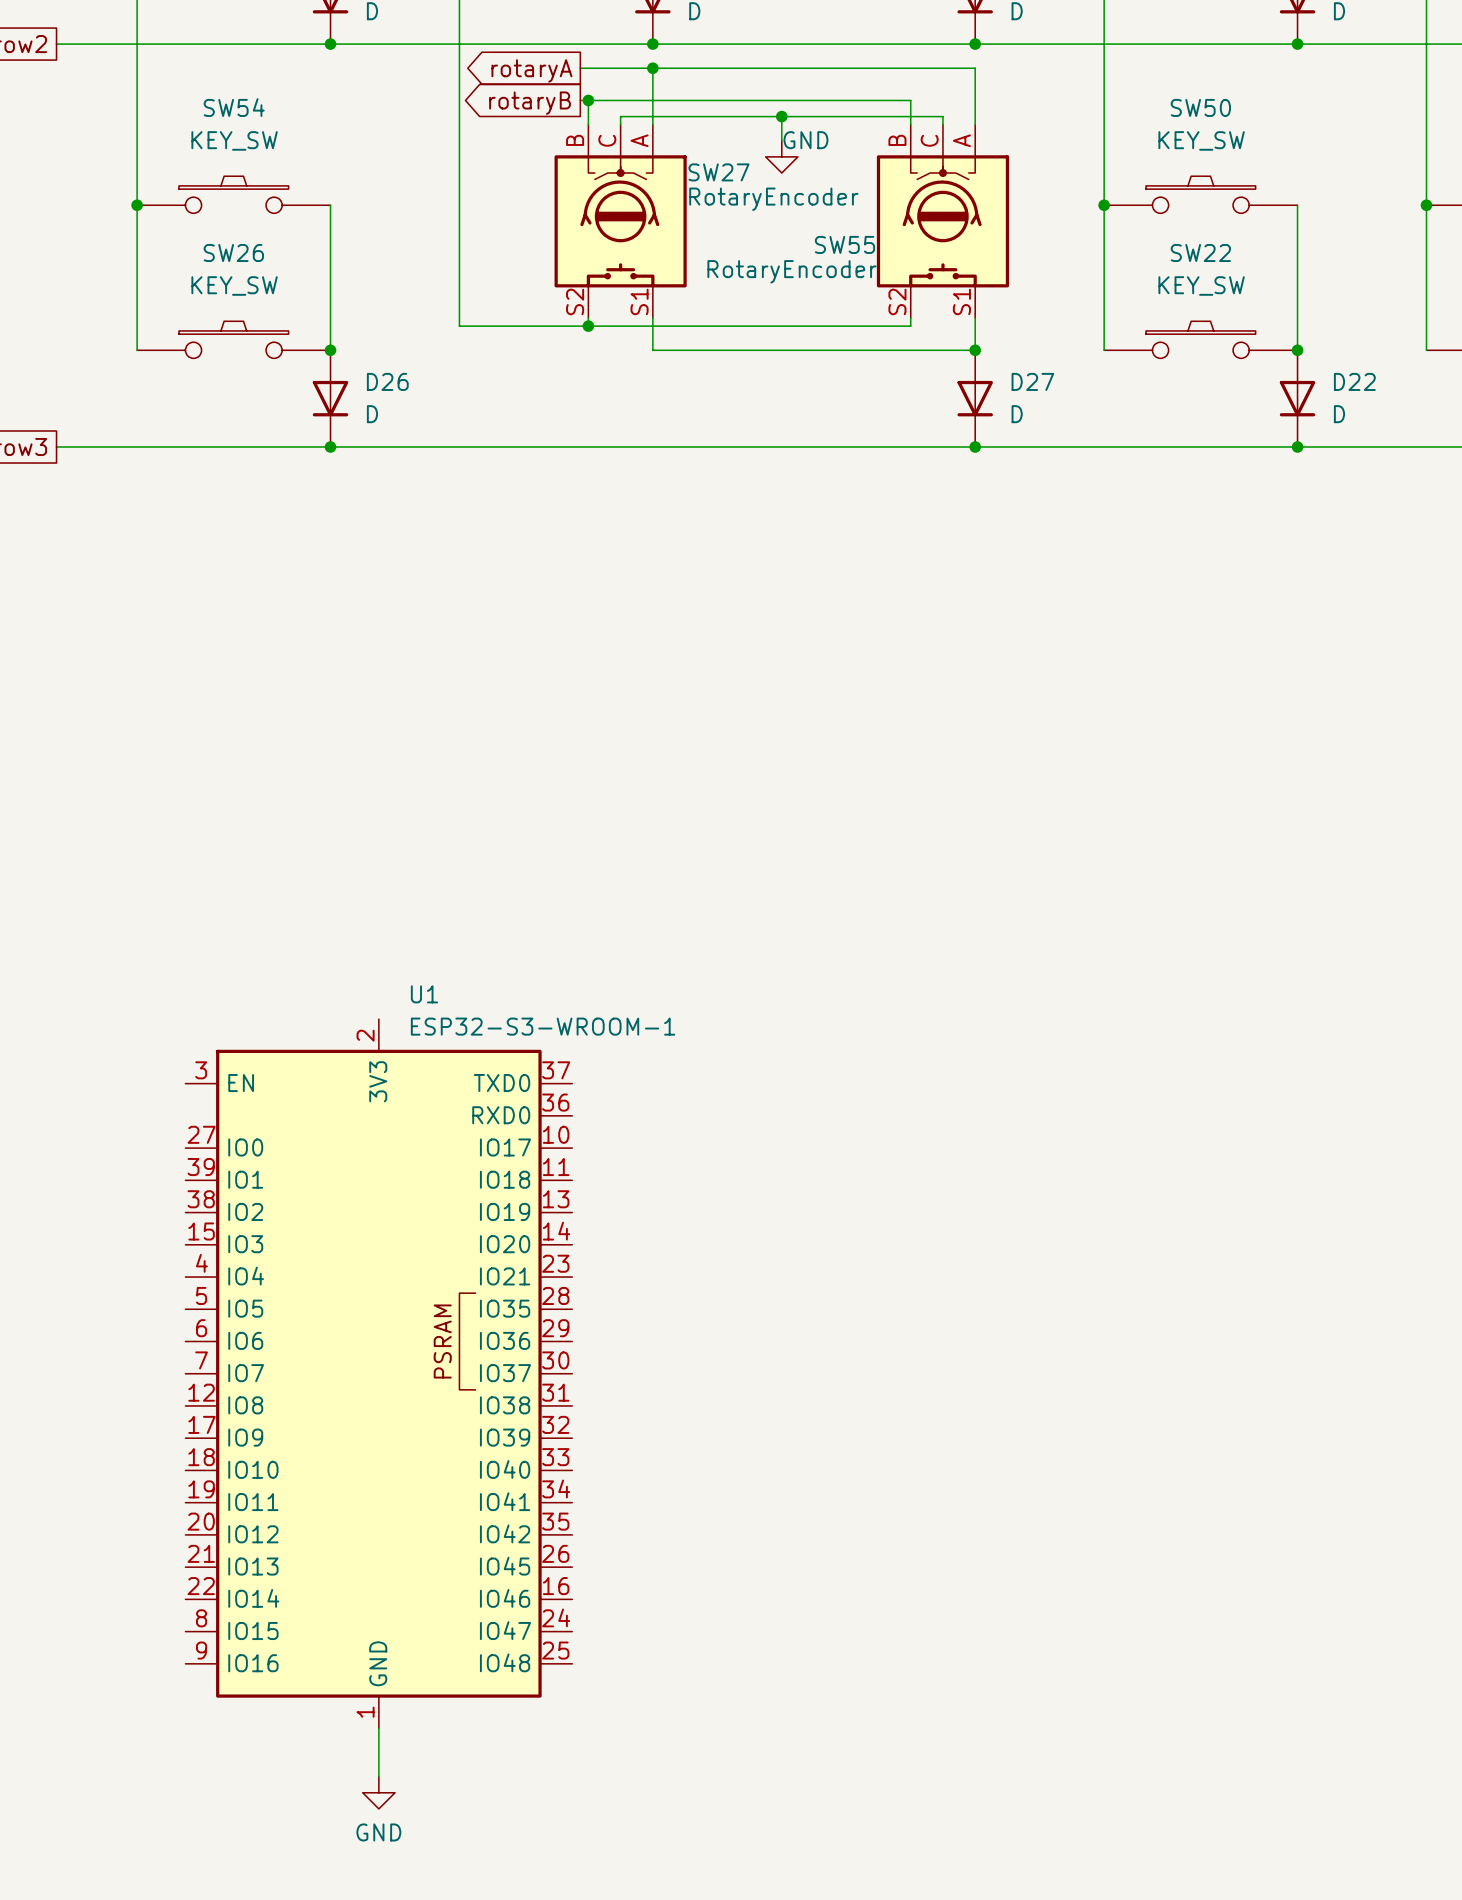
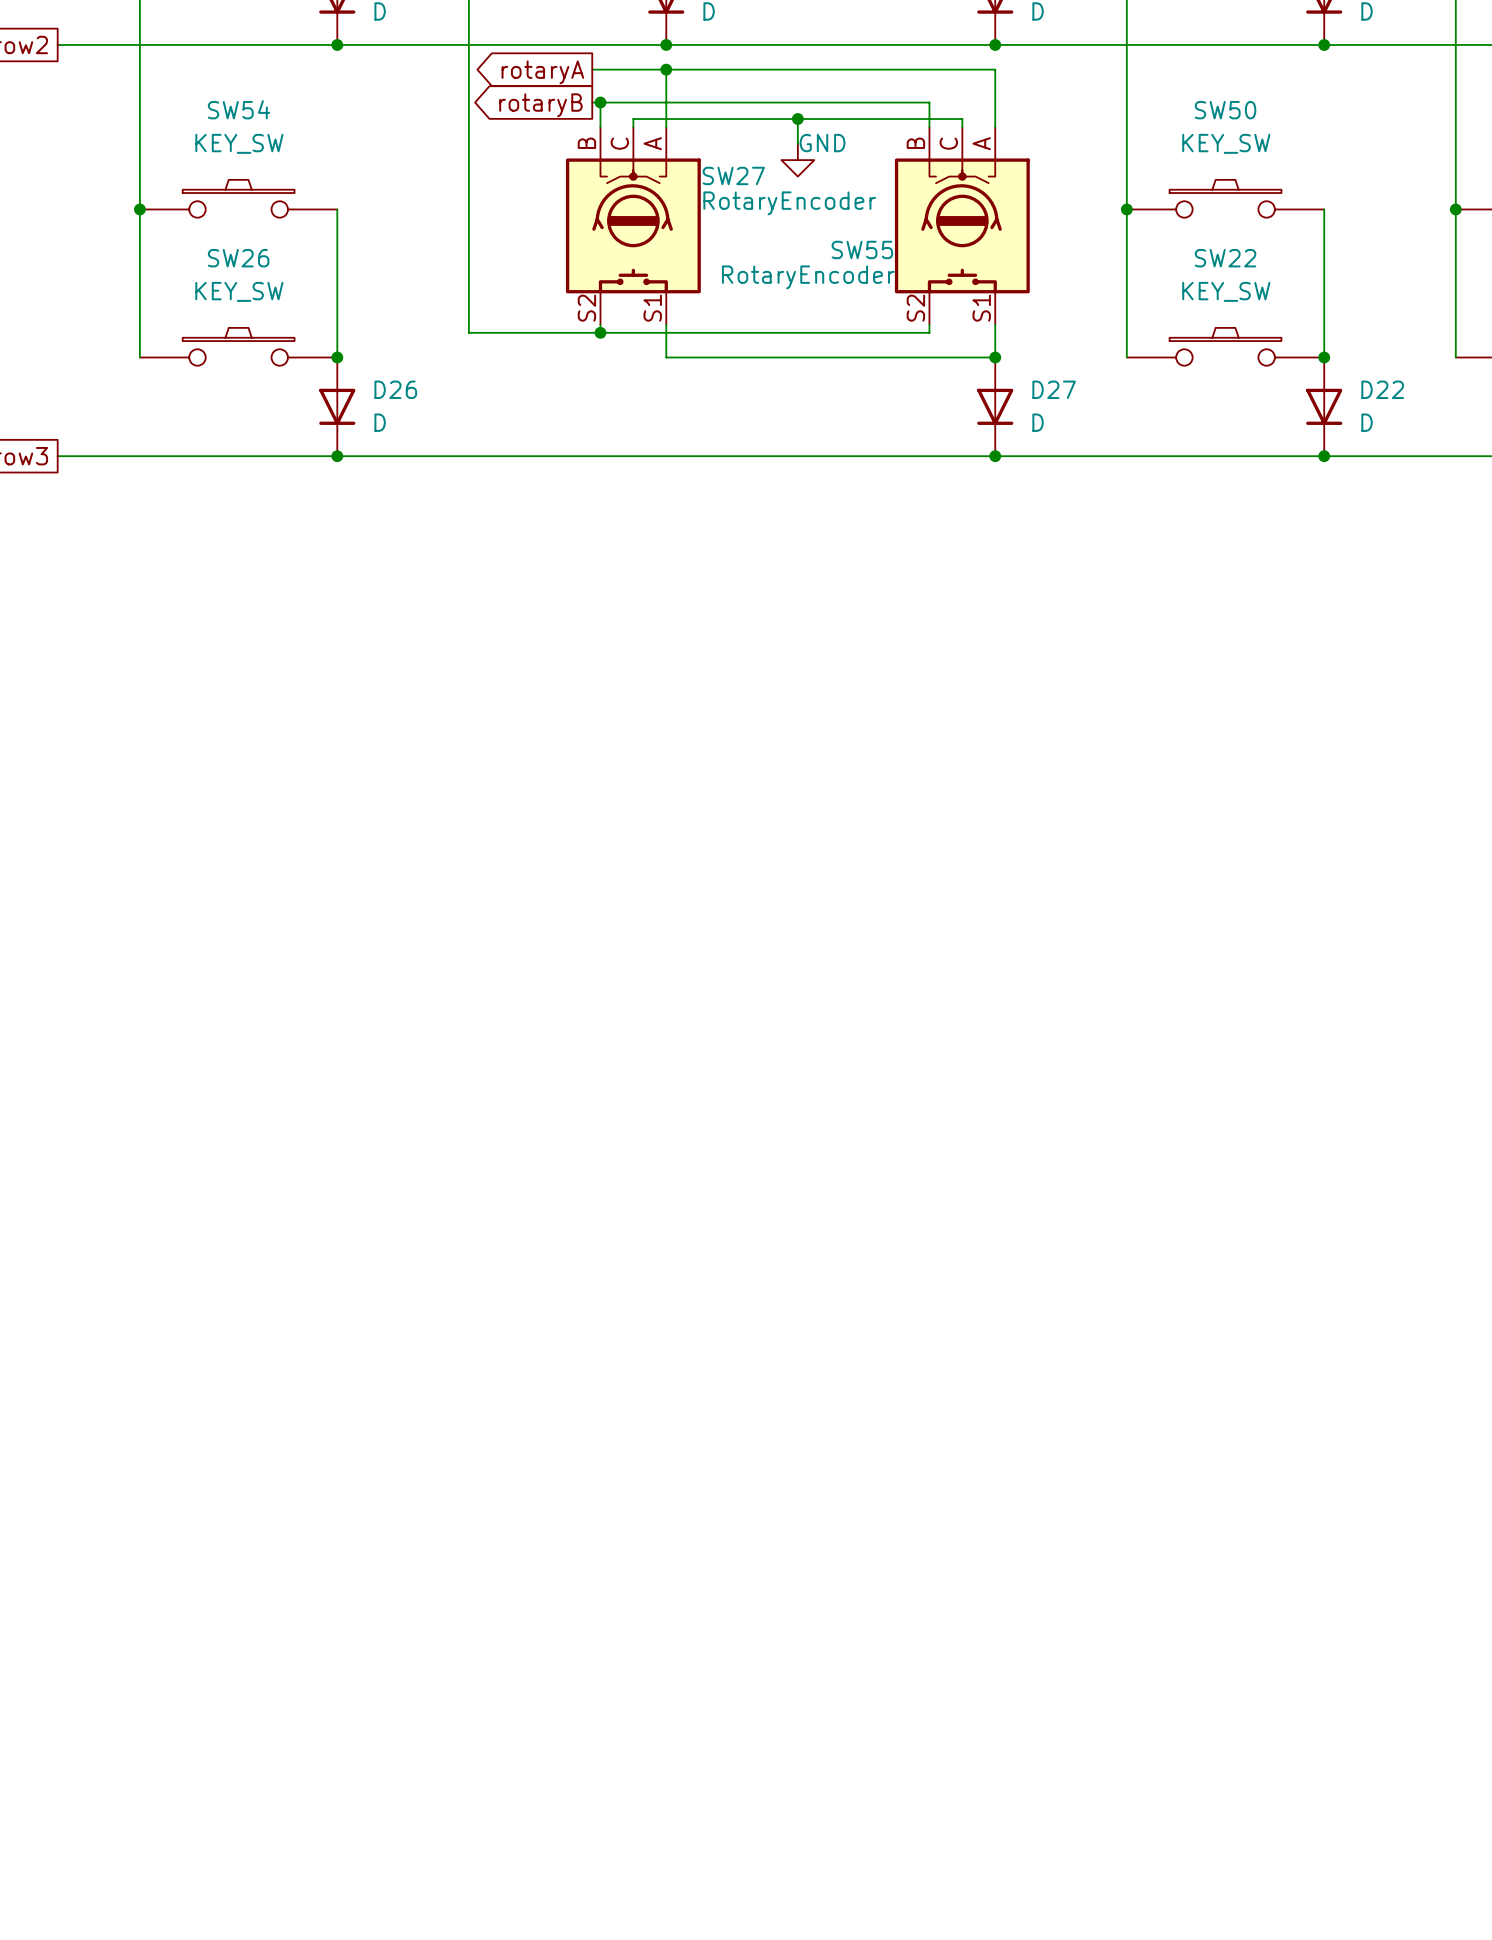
U1: ESP32-S3-WROOM-1 (378, 1373) -> none
wire: (378, 1728) (378, 1776) -> none
power symbol: GND (378, 1792) -> none

